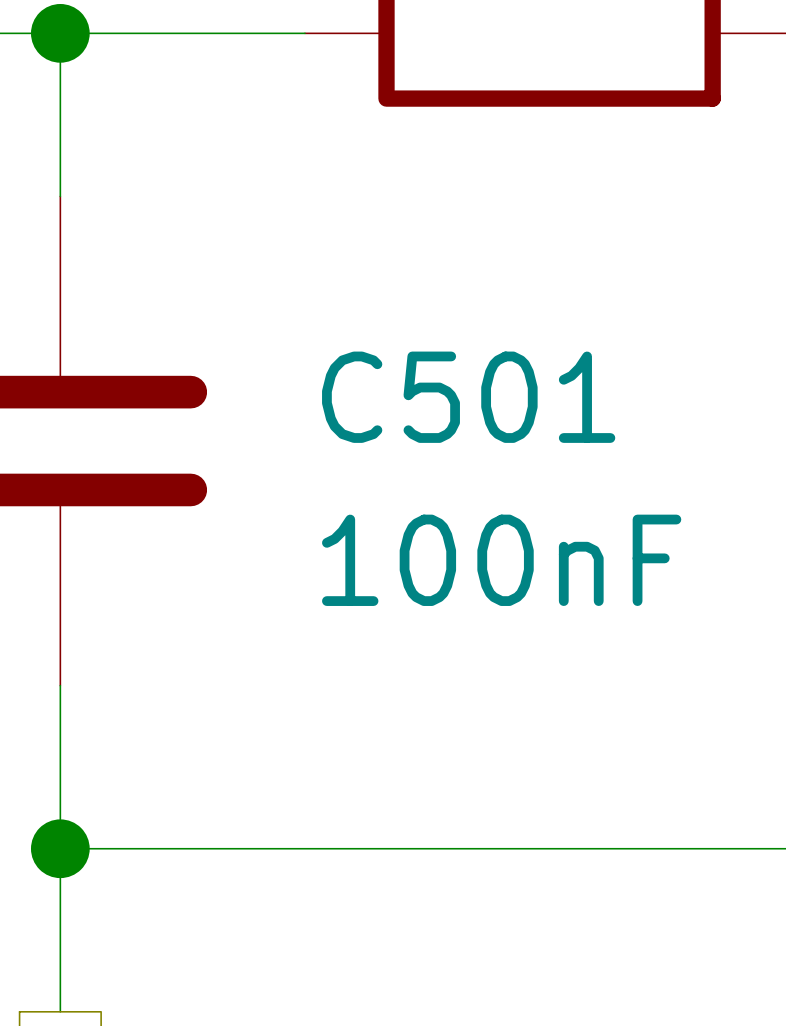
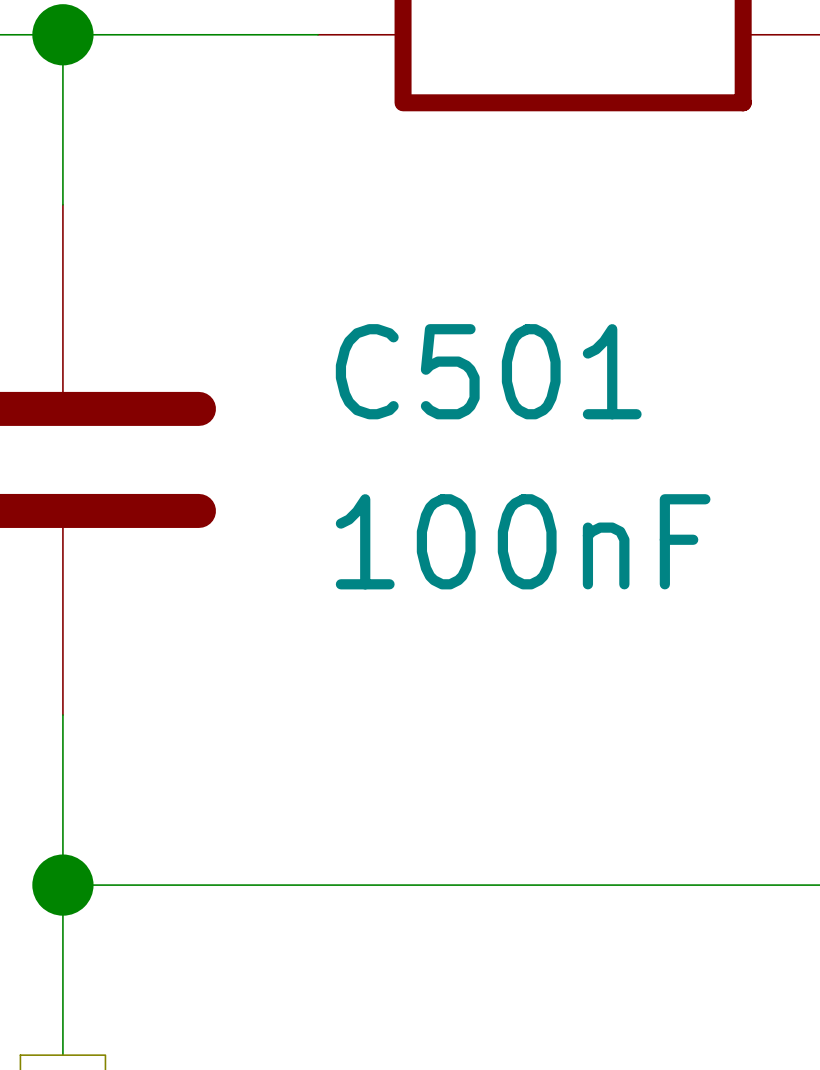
C501 name position: C501 (468, 397) -> C501 (488, 371)
C501 value position: 100nF (501, 560) -> 100nF (523, 541)

